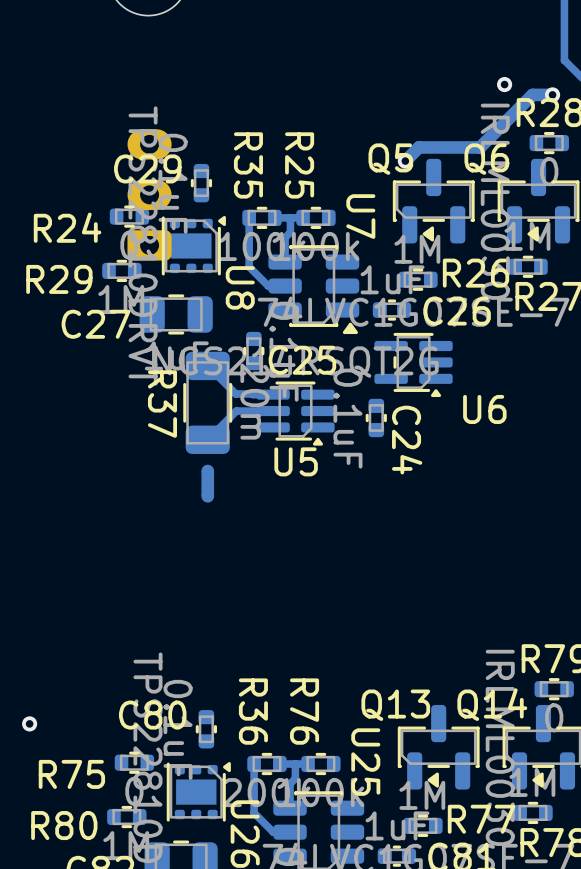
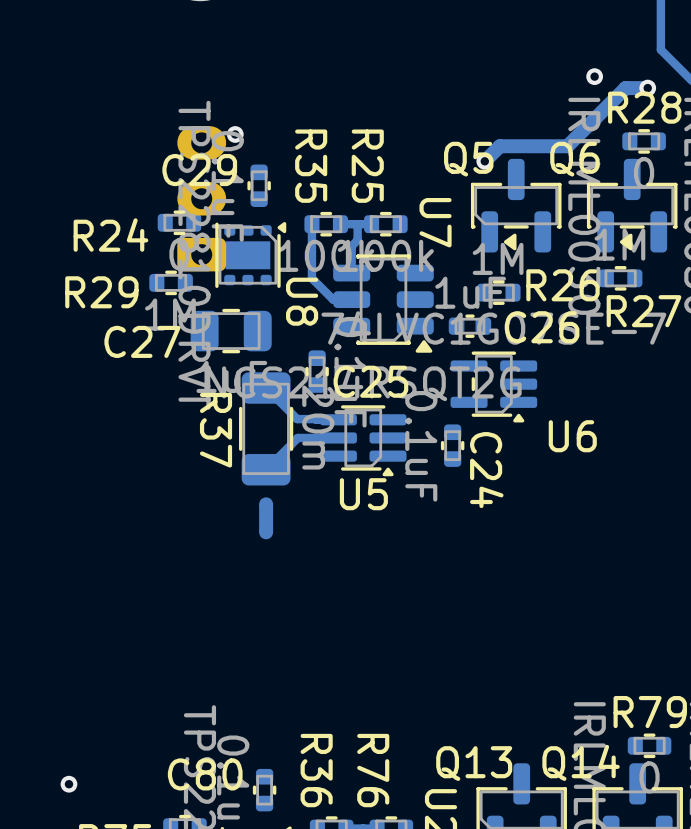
via: none -> (235, 134)

